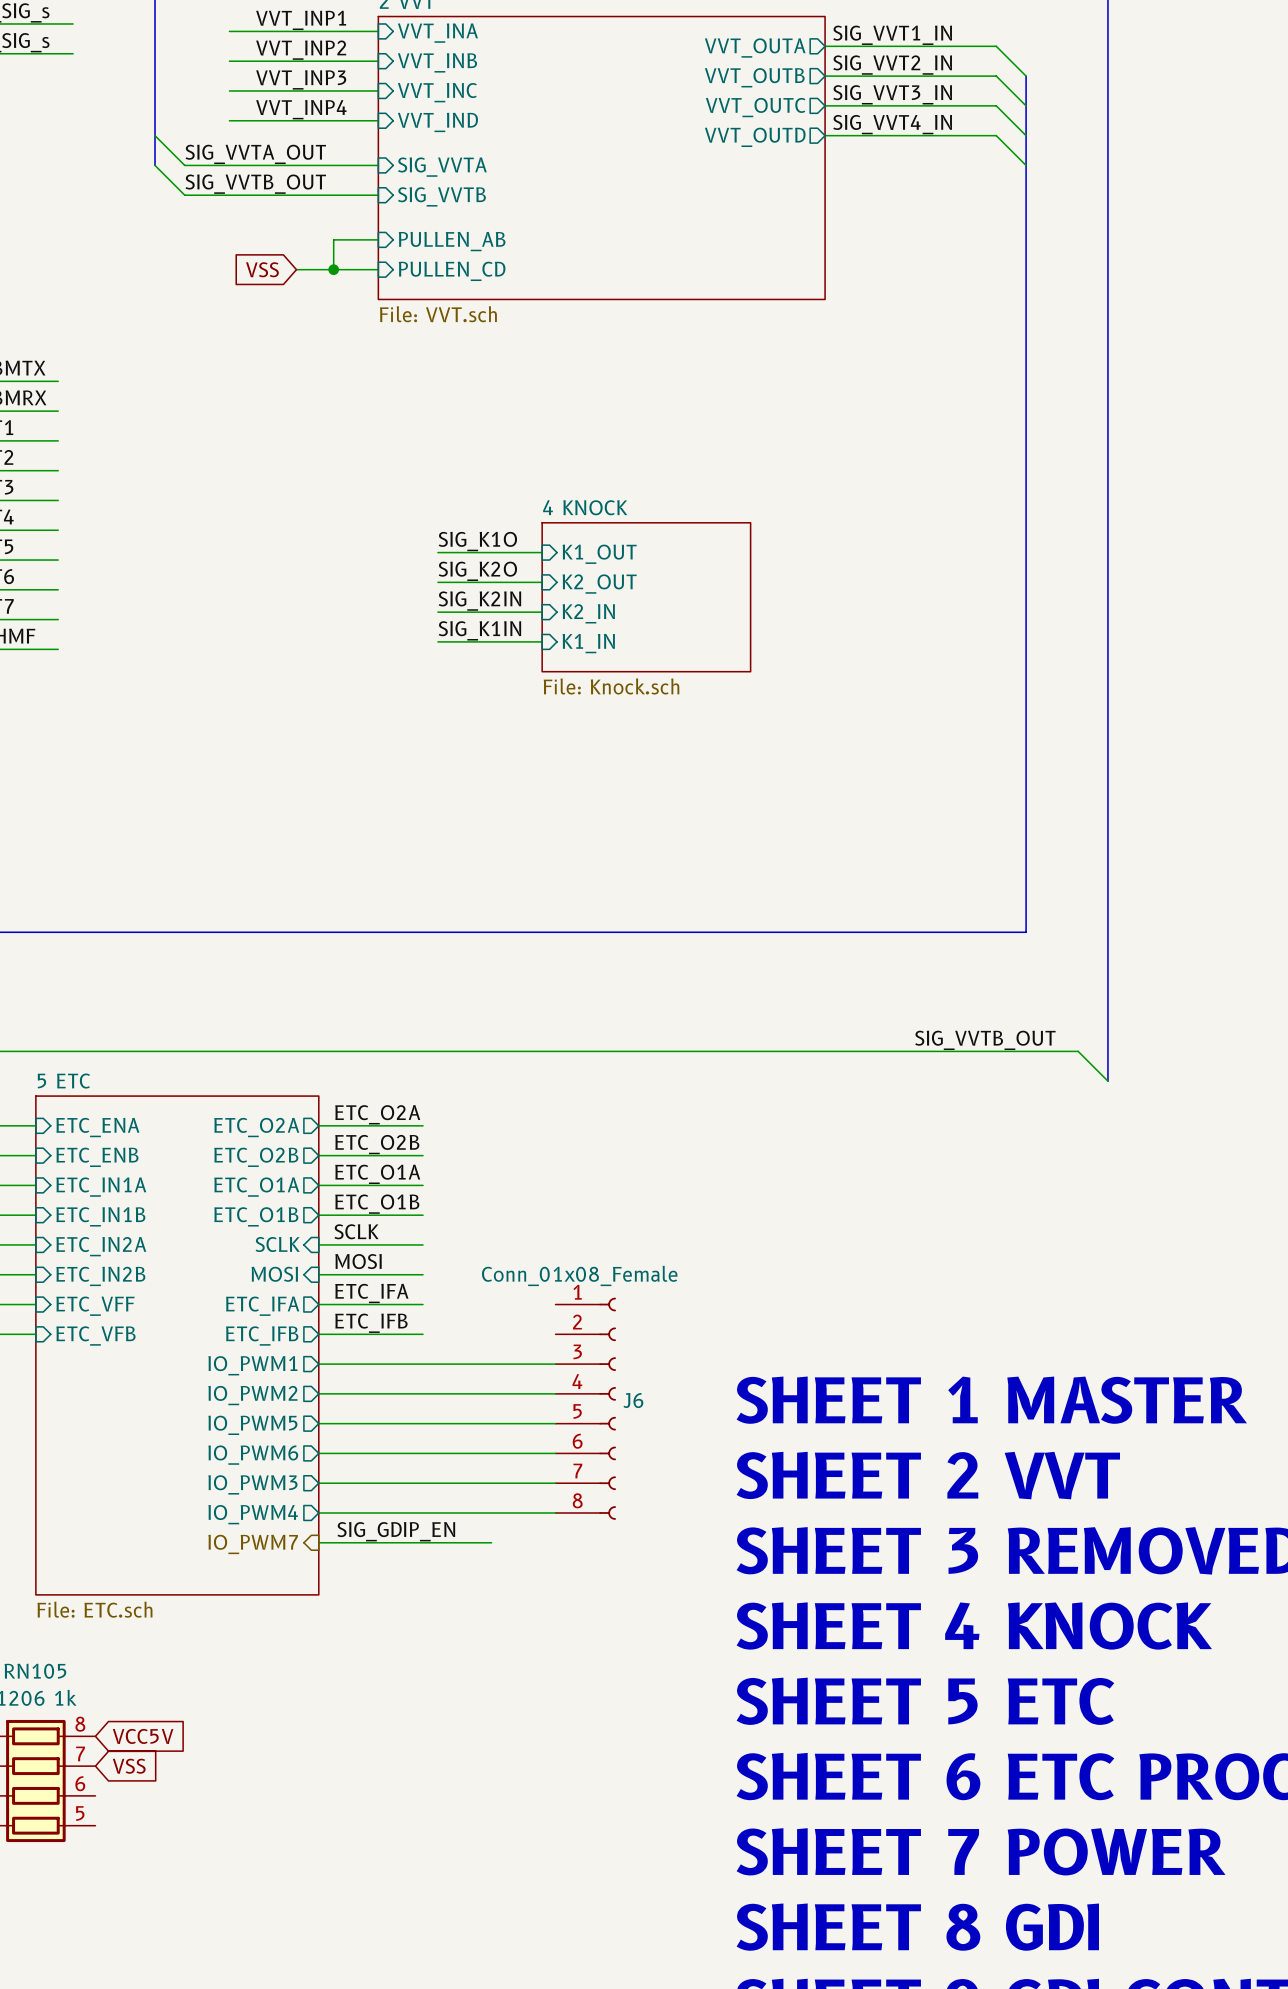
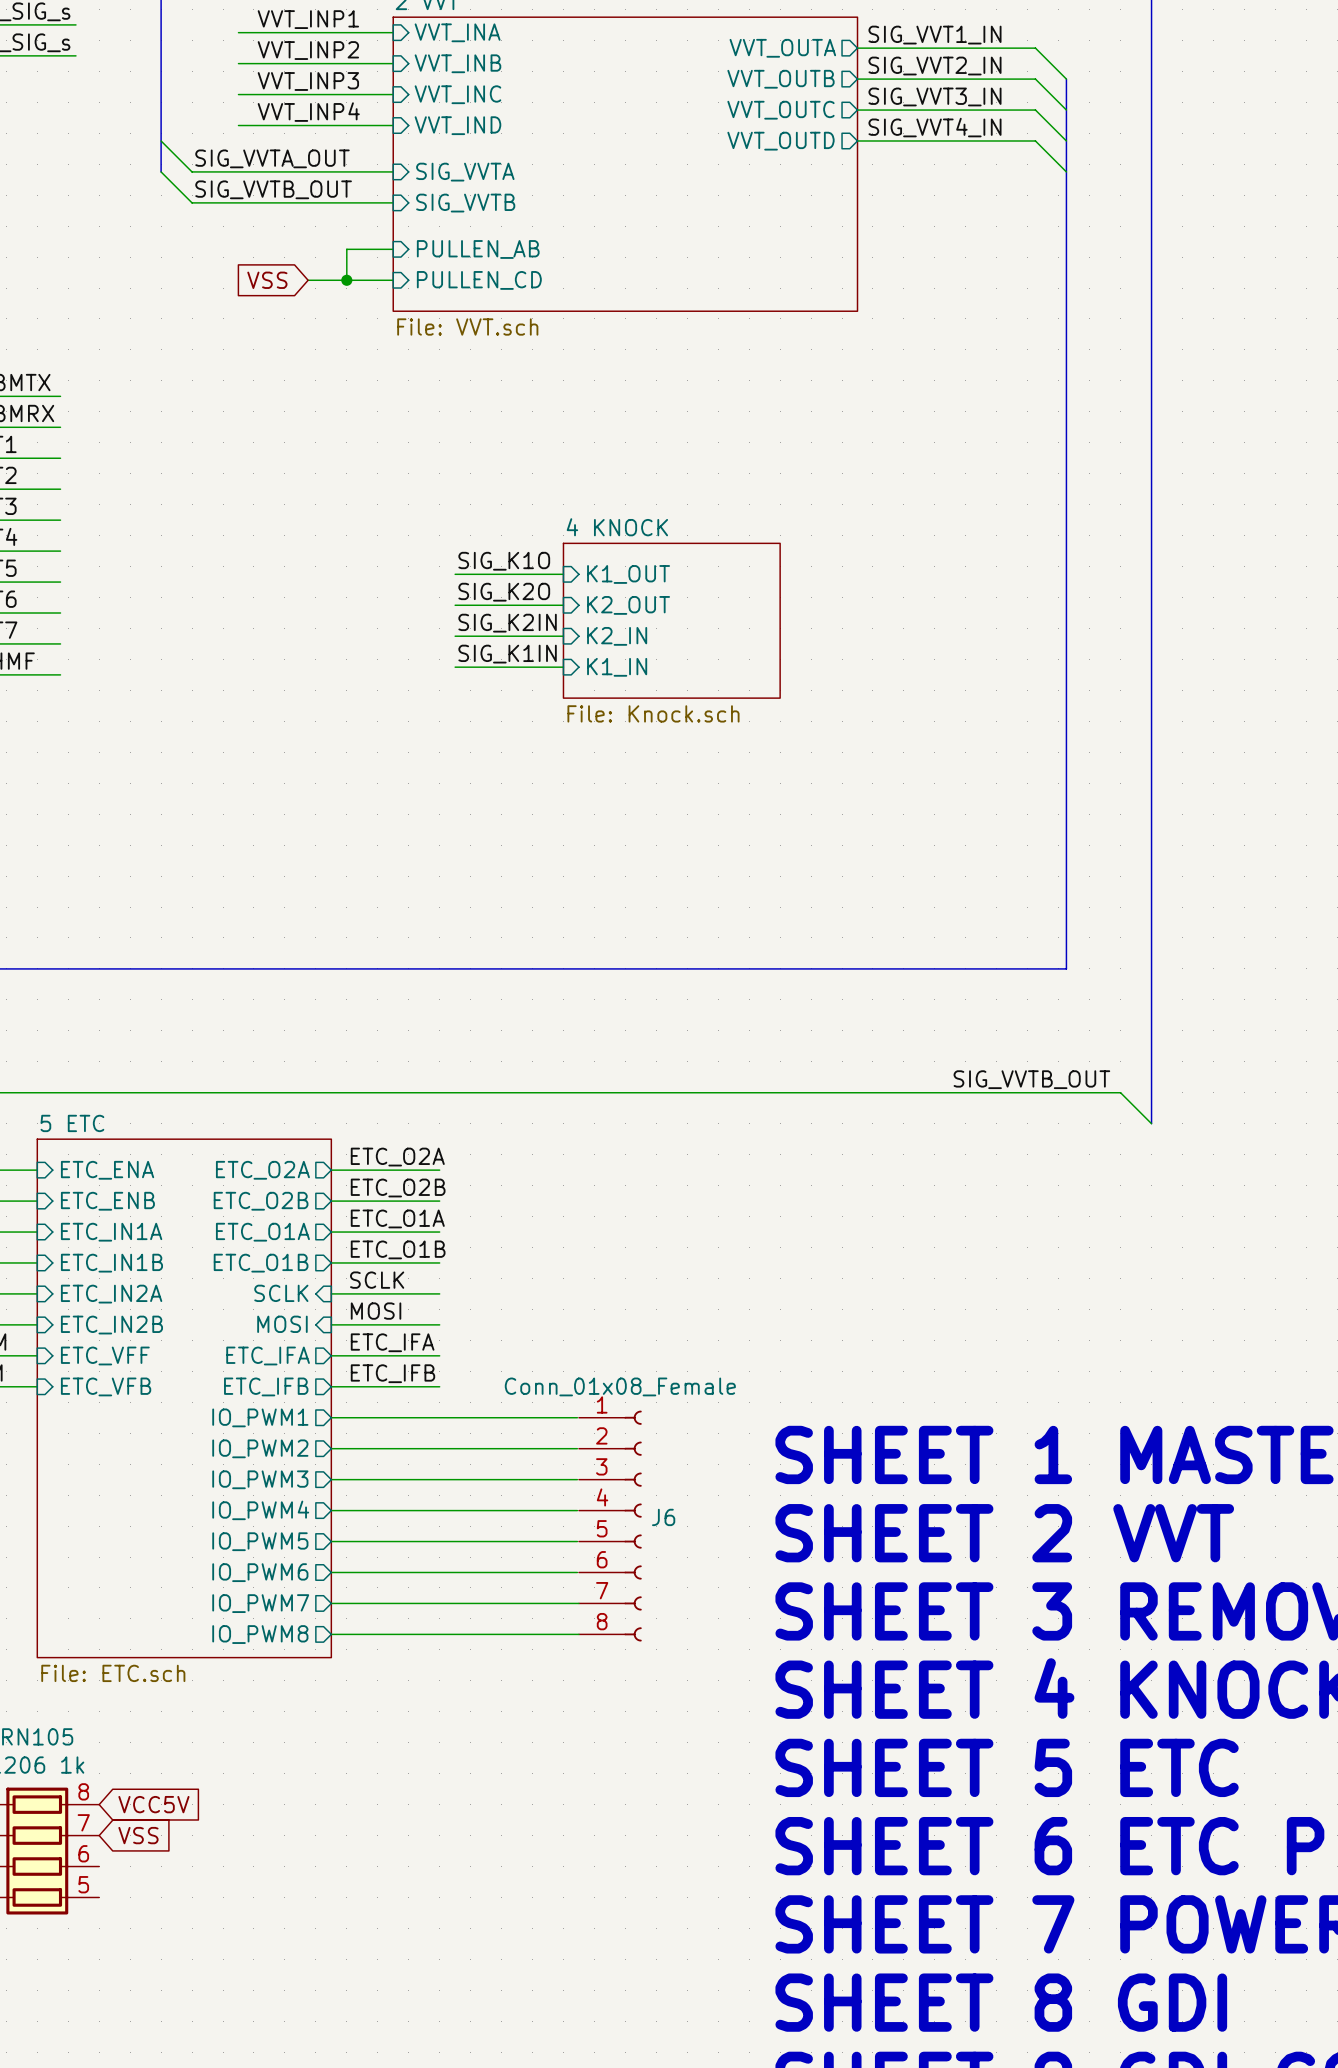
J6 position: (585, 1408) -> (610, 1526)
sheet pin: IO_PWM5 (252, 1425) -> IO_PWM3 (260, 1479)
sheet pin: IO_PWM6 (253, 1455) -> IO_PWM4 (260, 1510)
sheet pin: IO_PWM3 (252, 1484) -> IO_PWM5 (260, 1541)
sheet pin: IO_PWM4 (253, 1514) -> IO_PWM6 (260, 1572)
label: SIG_GDIP_EN (396, 1531) -> none
wire: none -> (510, 1603) (578, 1603)
sheet pin: none -> IO_PWM7 (260, 1603)
hierarchical label: IO_PWM7 (253, 1544) -> none
wire: none -> (331, 1634) (578, 1634)
sheet pin: none -> IO_PWM8 (260, 1634)

